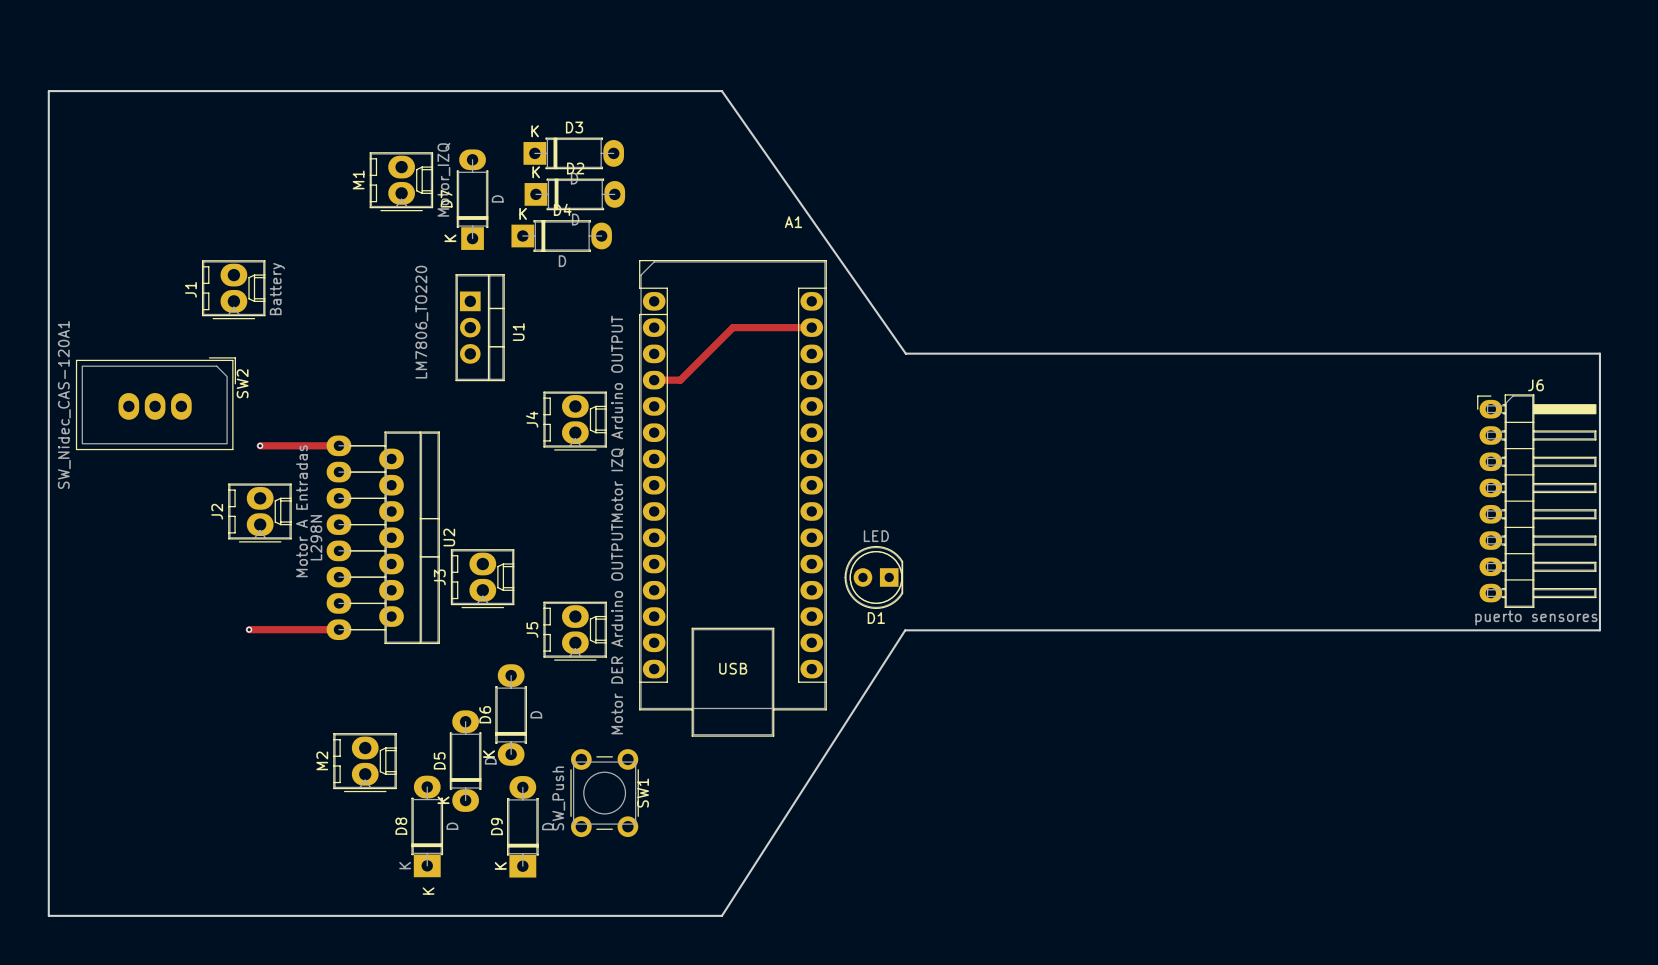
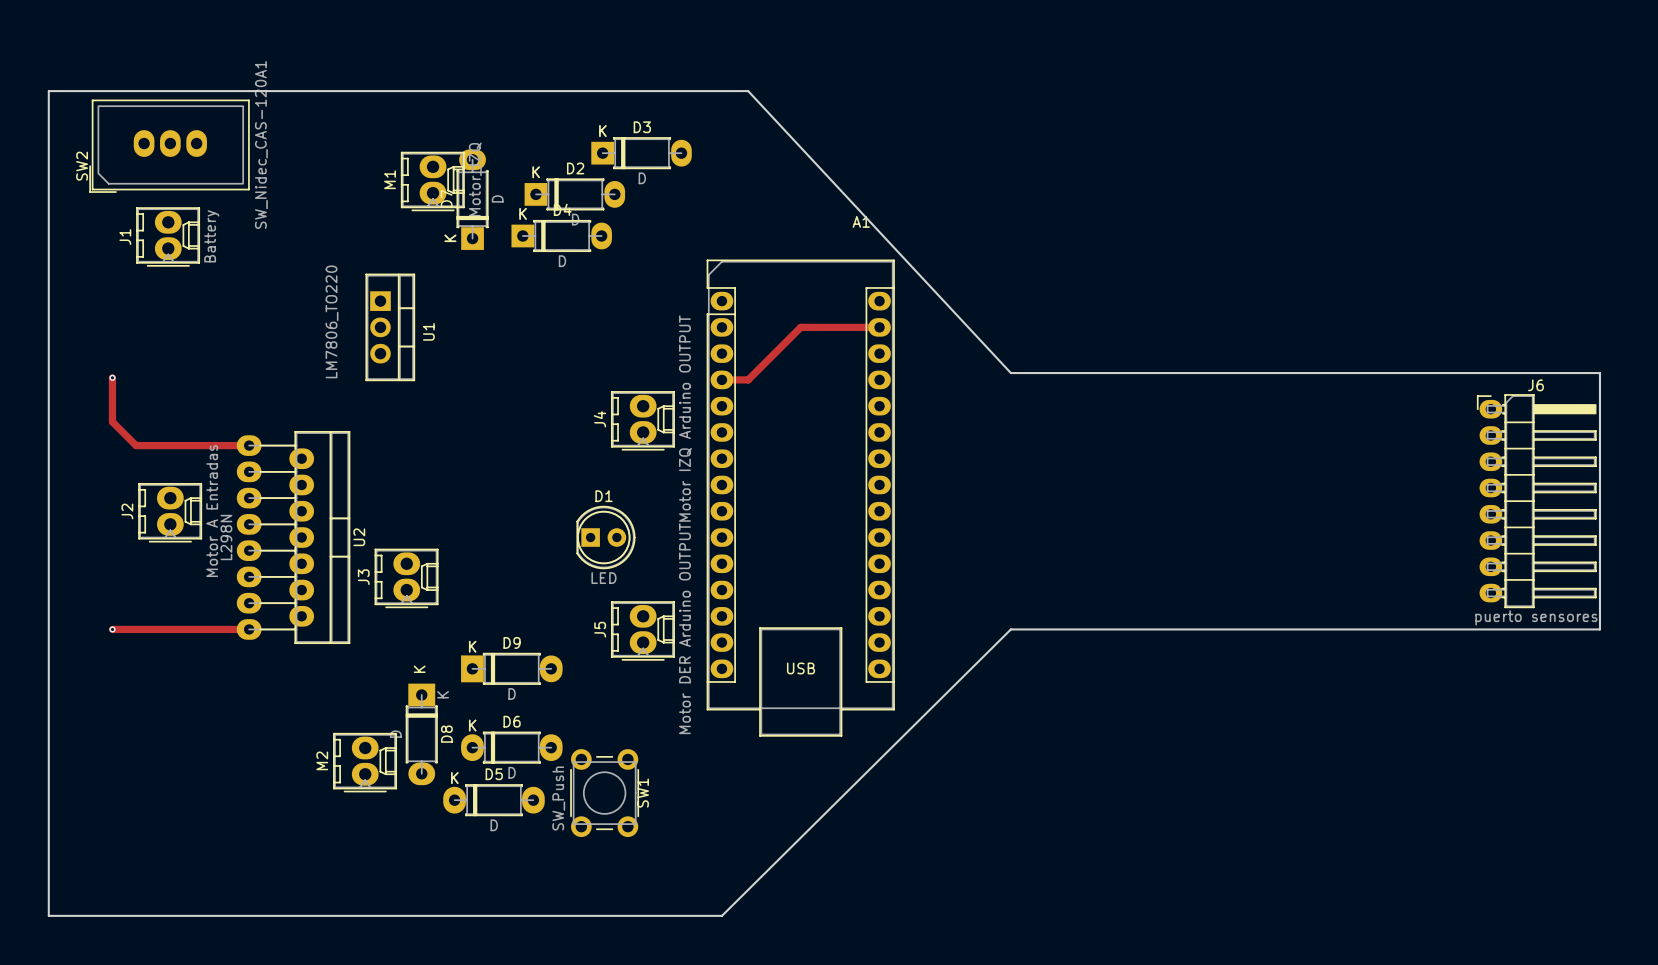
board edge: (721, 91) (905, 353) (1599, 353) (1599, 373) -> (721, 91) (748, 91) (1010, 373) (1599, 373)
D3 position: (573, 153) -> (641, 153)
M1 position: (401, 181) -> (432, 181)
J1 position: (233, 289) -> (168, 236)
U1 position: (480, 327) -> (390, 327)
track: (811, 327) (732, 327) (680, 380) (654, 380) -> (879, 327) (800, 327) (748, 379) (721, 379)
track: none -> (112, 377) (112, 421) (136, 445) (249, 445)
via: none -> (112, 377)
SW2 rotation: 0° (155, 403) -> 180° (169, 146)
SW2 position: (155, 403) -> (169, 146)
J4 position: (575, 421) -> (642, 420)
track: (260, 445) (338, 445) -> none
via: (260, 445) -> none
A1 position: (732, 498) -> (800, 498)
J2 position: (259, 512) -> (170, 512)
U2 position: (383, 537) -> (293, 537)
D1 rotation: 0° (873, 577) -> 180° (605, 537)
D1 position: (873, 577) -> (605, 537)
J3 position: (482, 578) -> (406, 578)
via: none -> (112, 629)
track: (249, 629) (338, 629) -> (249, 629) (112, 629)
via: (249, 629) -> none
board edge: (1599, 629) (905, 630) (721, 915) -> (1599, 629) (1010, 629) (721, 915)
J5 position: (575, 631) -> (642, 630)
D6 rotation: 0° (511, 714) -> 90° clockwise (511, 747)
D5 rotation: 0° (465, 761) -> 90° clockwise (494, 800)
D8 rotation: 0° (427, 826) -> 180° (421, 734)
D8 position: (427, 826) -> (421, 734)
D9 rotation: 0° (522, 826) -> 90° clockwise (511, 668)
D9 position: (522, 826) -> (511, 668)

